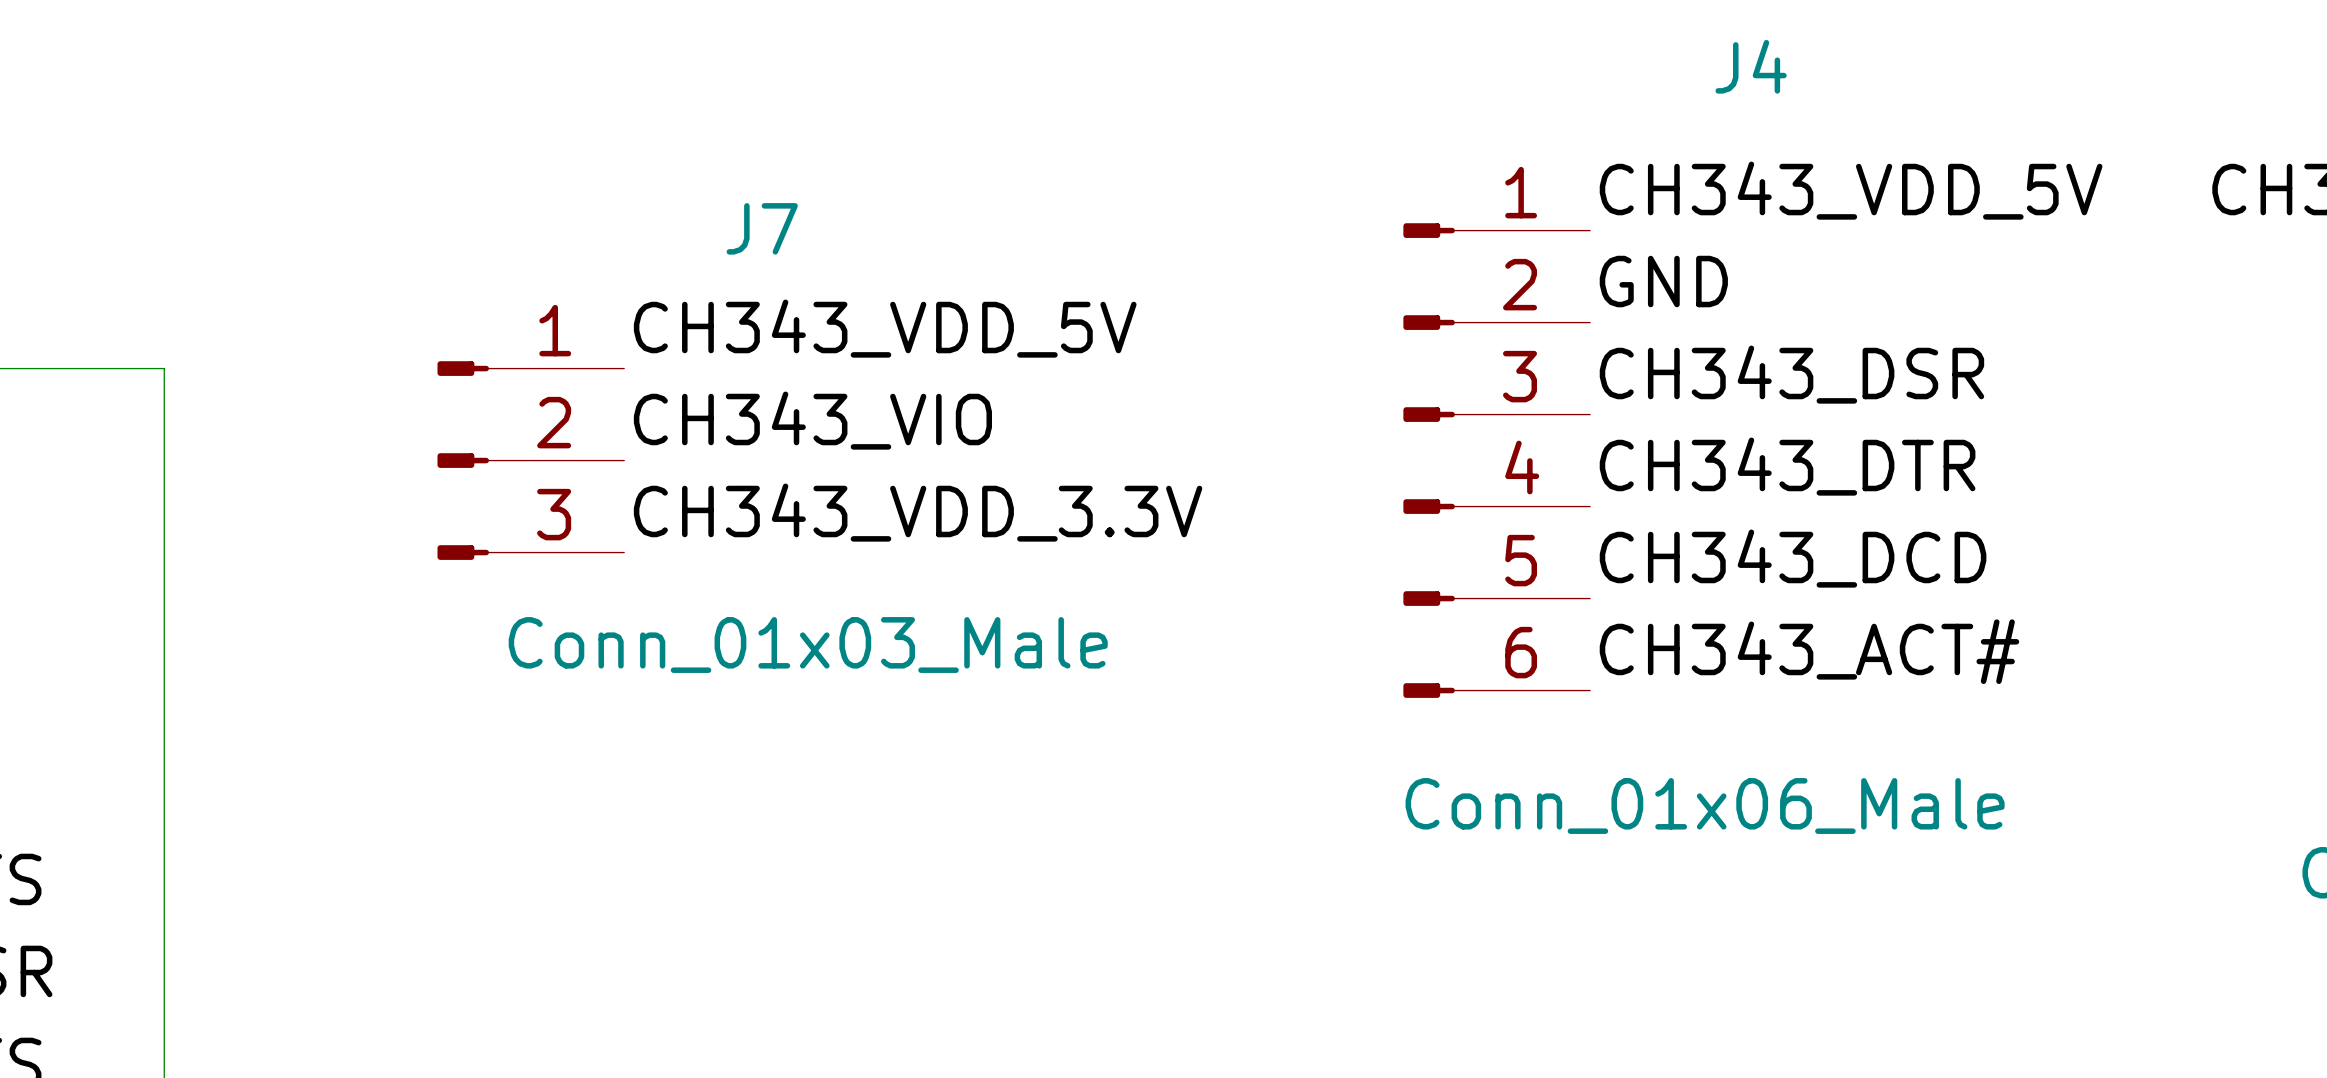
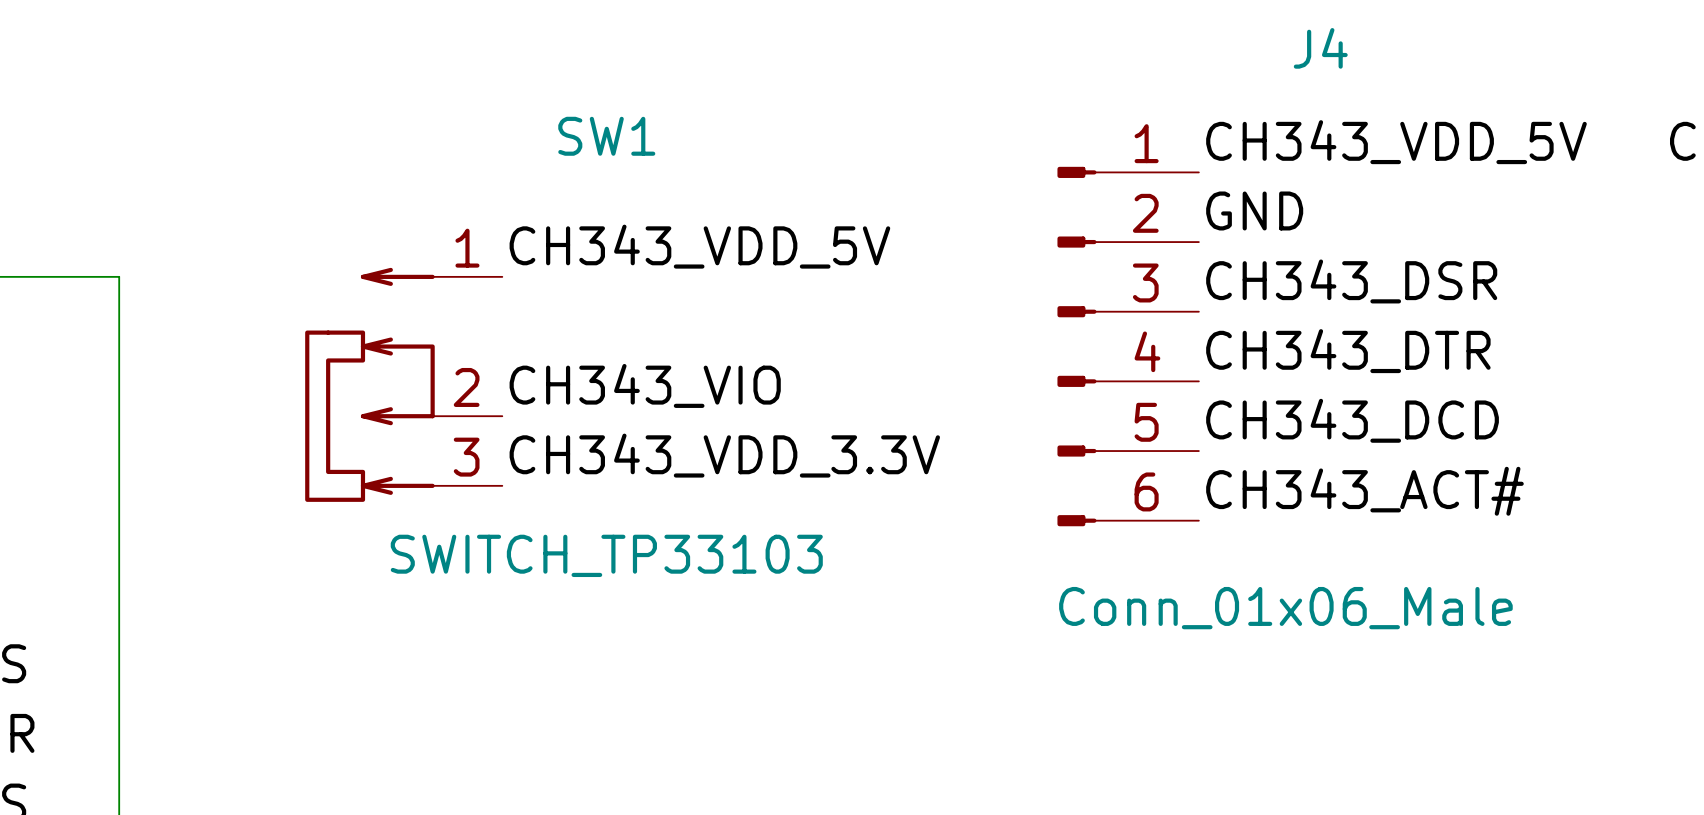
label position: CH343_VDD_5V (885, 328) -> CH343_VDD_5V (699, 246)
label position: CH343_VIO (812, 420) -> CH343_VIO (645, 385)
J7: Conn_01x03_Male (530, 460) -> none
SW1: none -> SWITCH_TP33103 (403, 384)
label position: CH343_VDD_3.3V (918, 512) -> CH343_VDD_3.3V (724, 455)

